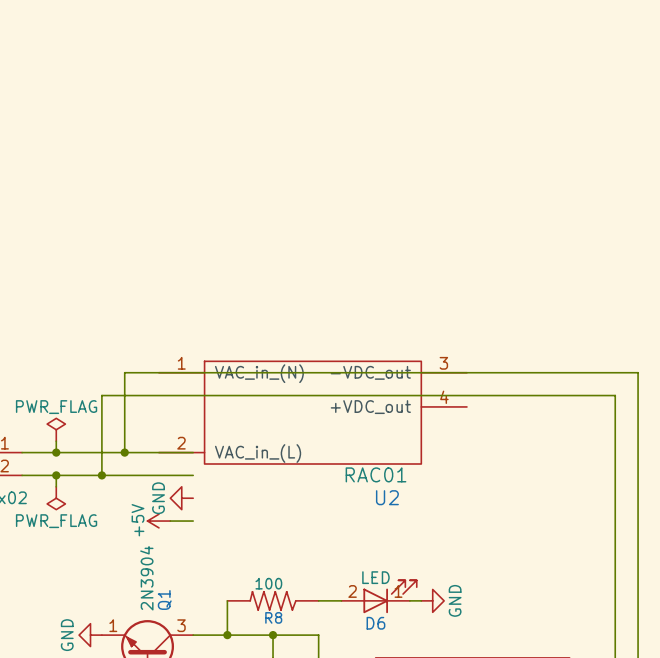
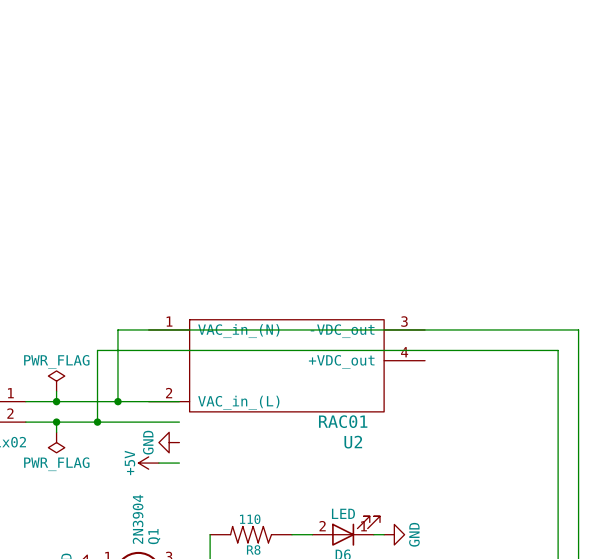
R8 value: 100 (268, 583) -> 110 (250, 519)

